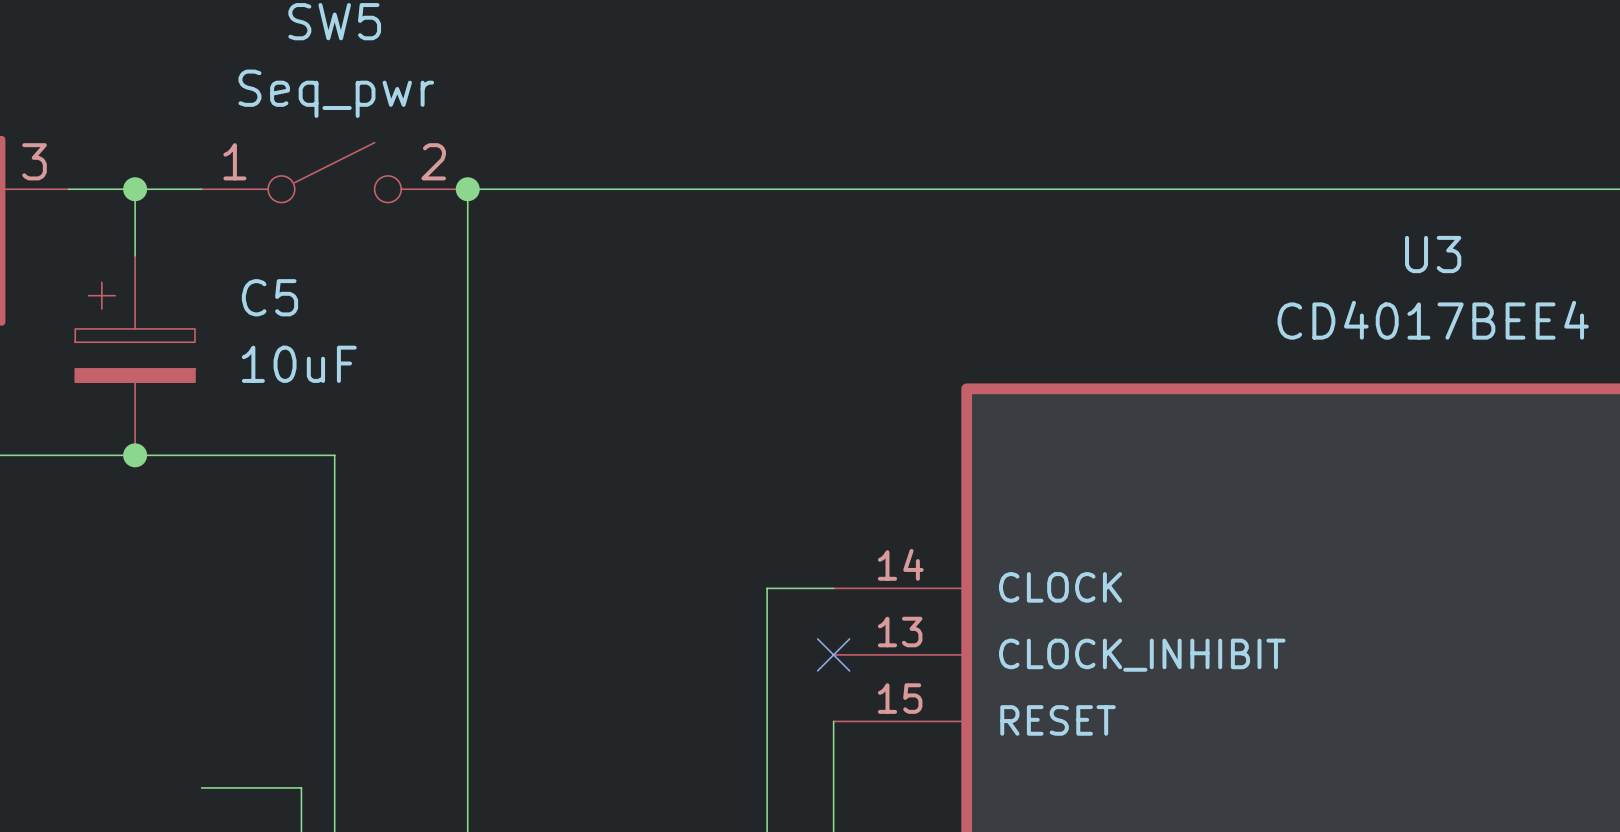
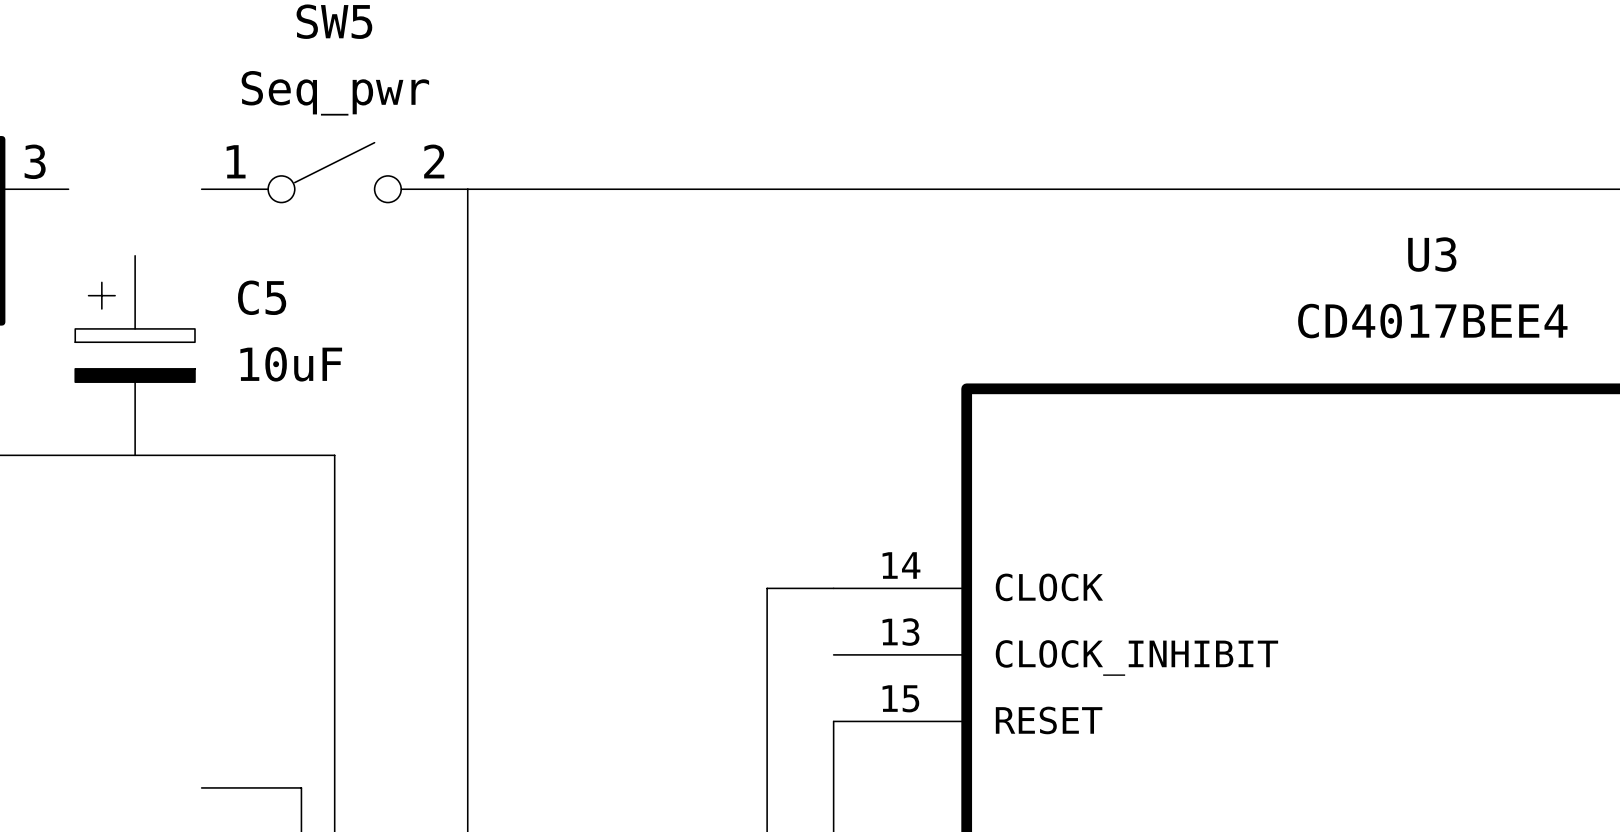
wire: (68, 189) (201, 189) -> none
wire: (135, 189) (135, 255) -> none
junction: (135, 189) -> none
junction: (467, 189) -> none
junction: (135, 455) -> none
no-connect mark: (833, 654) -> none

